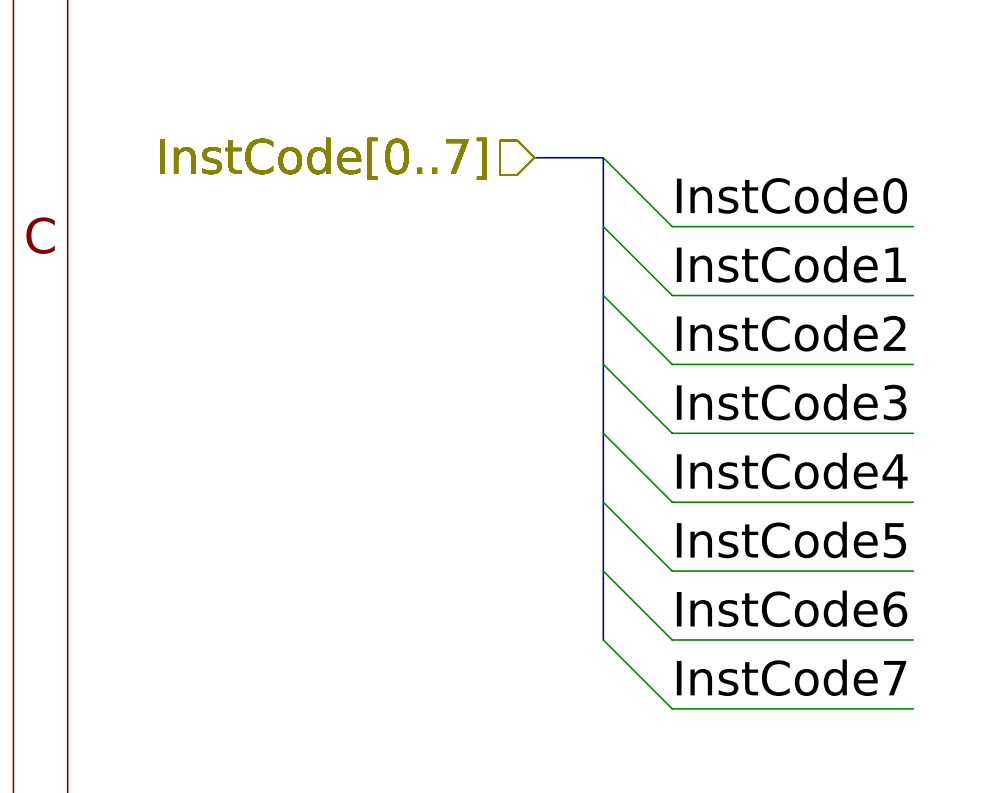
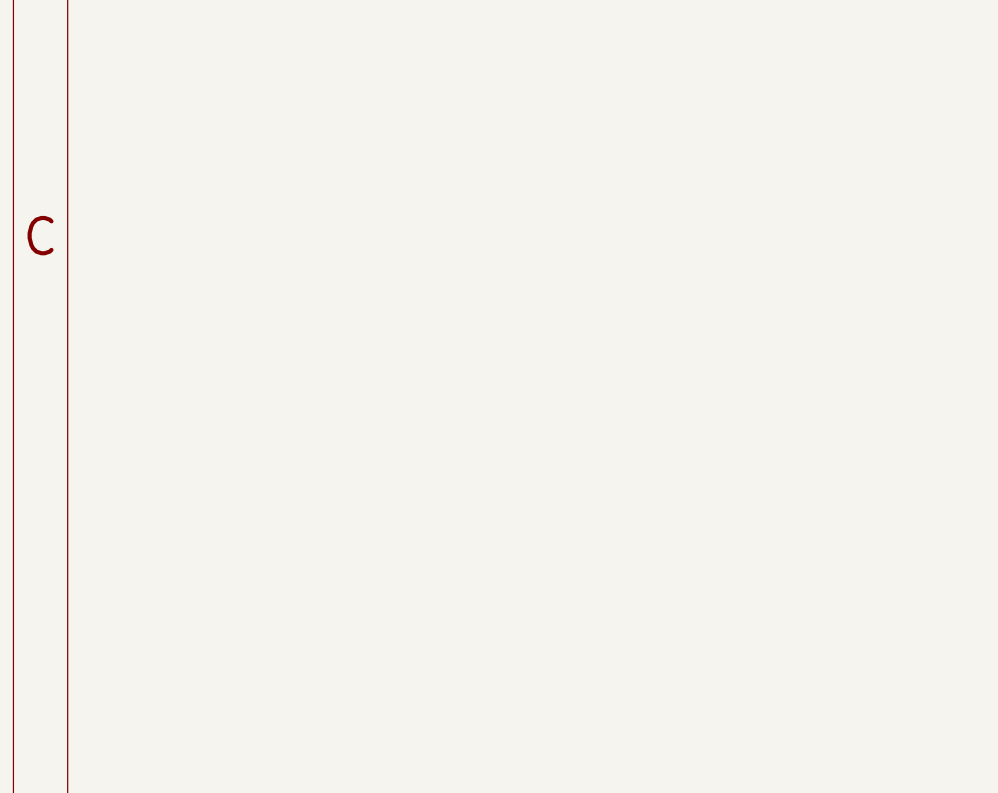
bus: (534, 157) (603, 157) (603, 639) -> none
wire: (603, 157) (672, 226) (913, 226) -> none
hierarchical label: InstCode[0..7] (323, 158) -> none
label: InstCode0 (791, 195) -> none
wire: (603, 226) (672, 295) (913, 295) -> none
label: InstCode1 (791, 264) -> none
wire: (603, 295) (672, 364) (913, 364) -> none
label: InstCode2 (791, 333) -> none
wire: (603, 364) (672, 433) (913, 433) -> none
label: InstCode3 (791, 402) -> none
wire: (603, 433) (672, 502) (913, 502) -> none
label: InstCode4 (792, 471) -> none
wire: (603, 502) (672, 571) (913, 571) -> none
label: InstCode5 (791, 539) -> none
wire: (603, 571) (672, 639) (913, 639) -> none
label: InstCode6 (792, 608) -> none
wire: (603, 639) (672, 708) (913, 708) -> none
label: InstCode7 (791, 677) -> none

